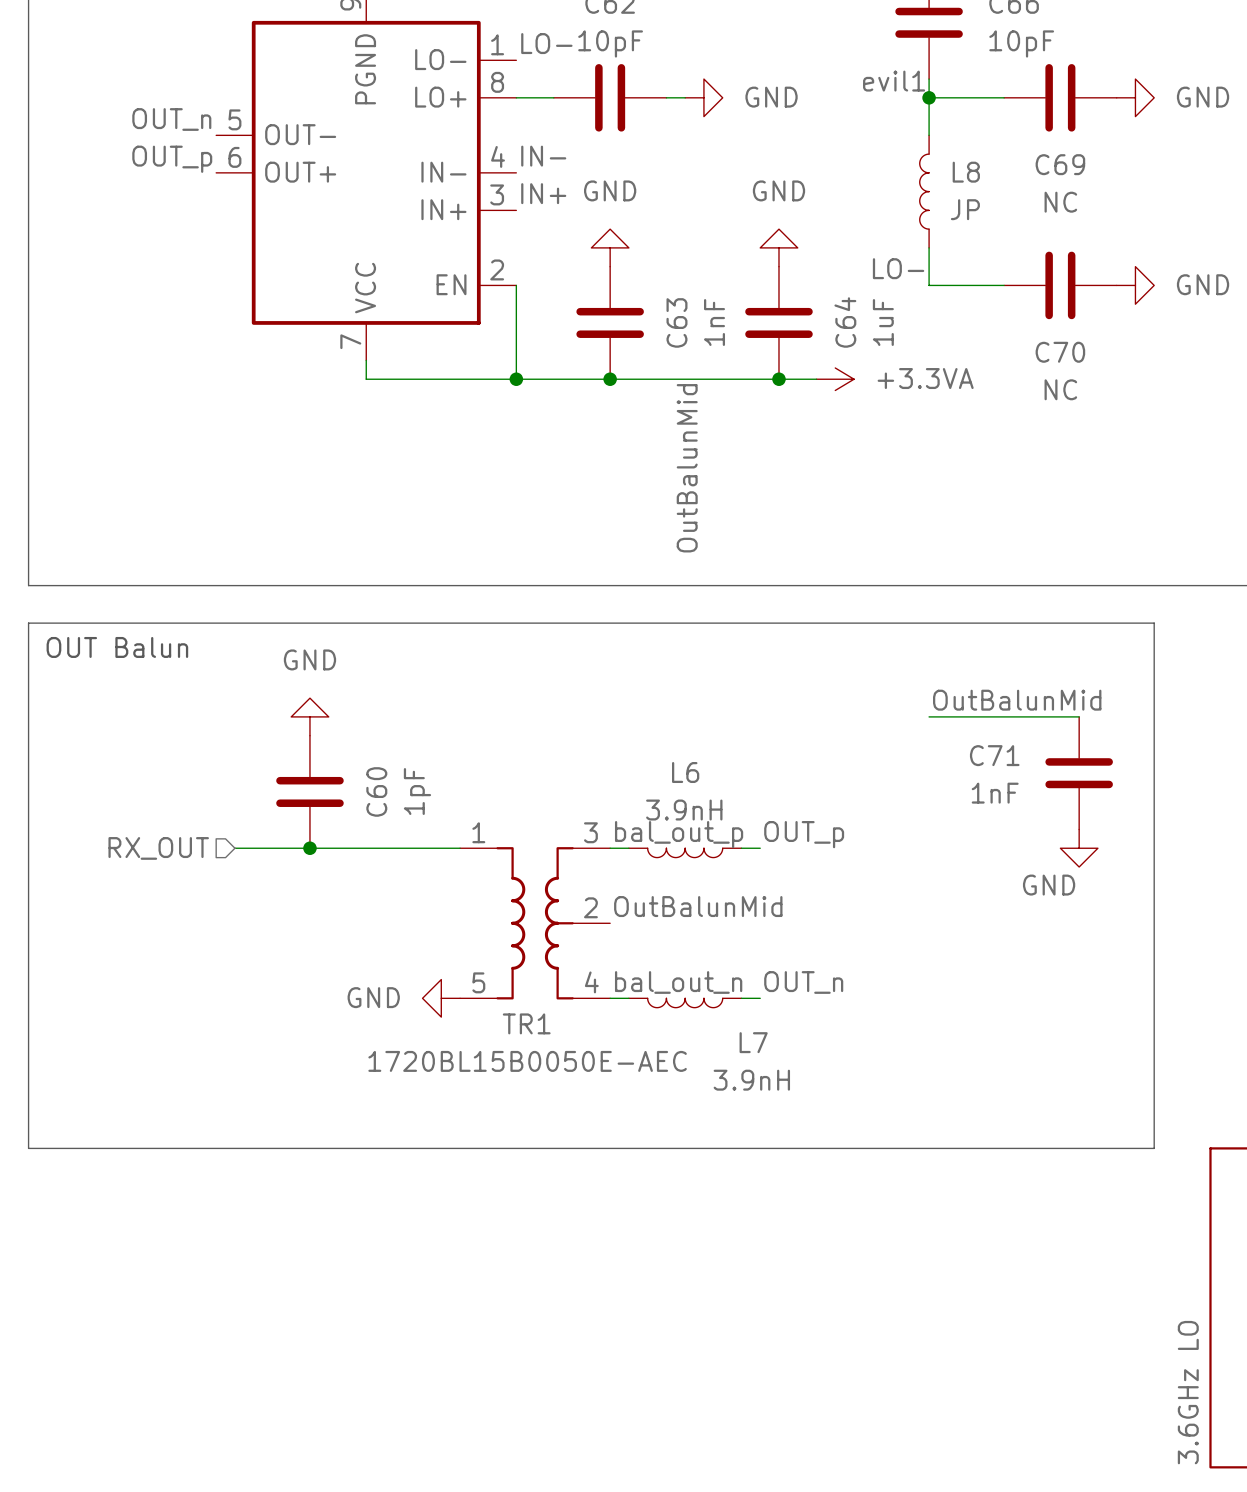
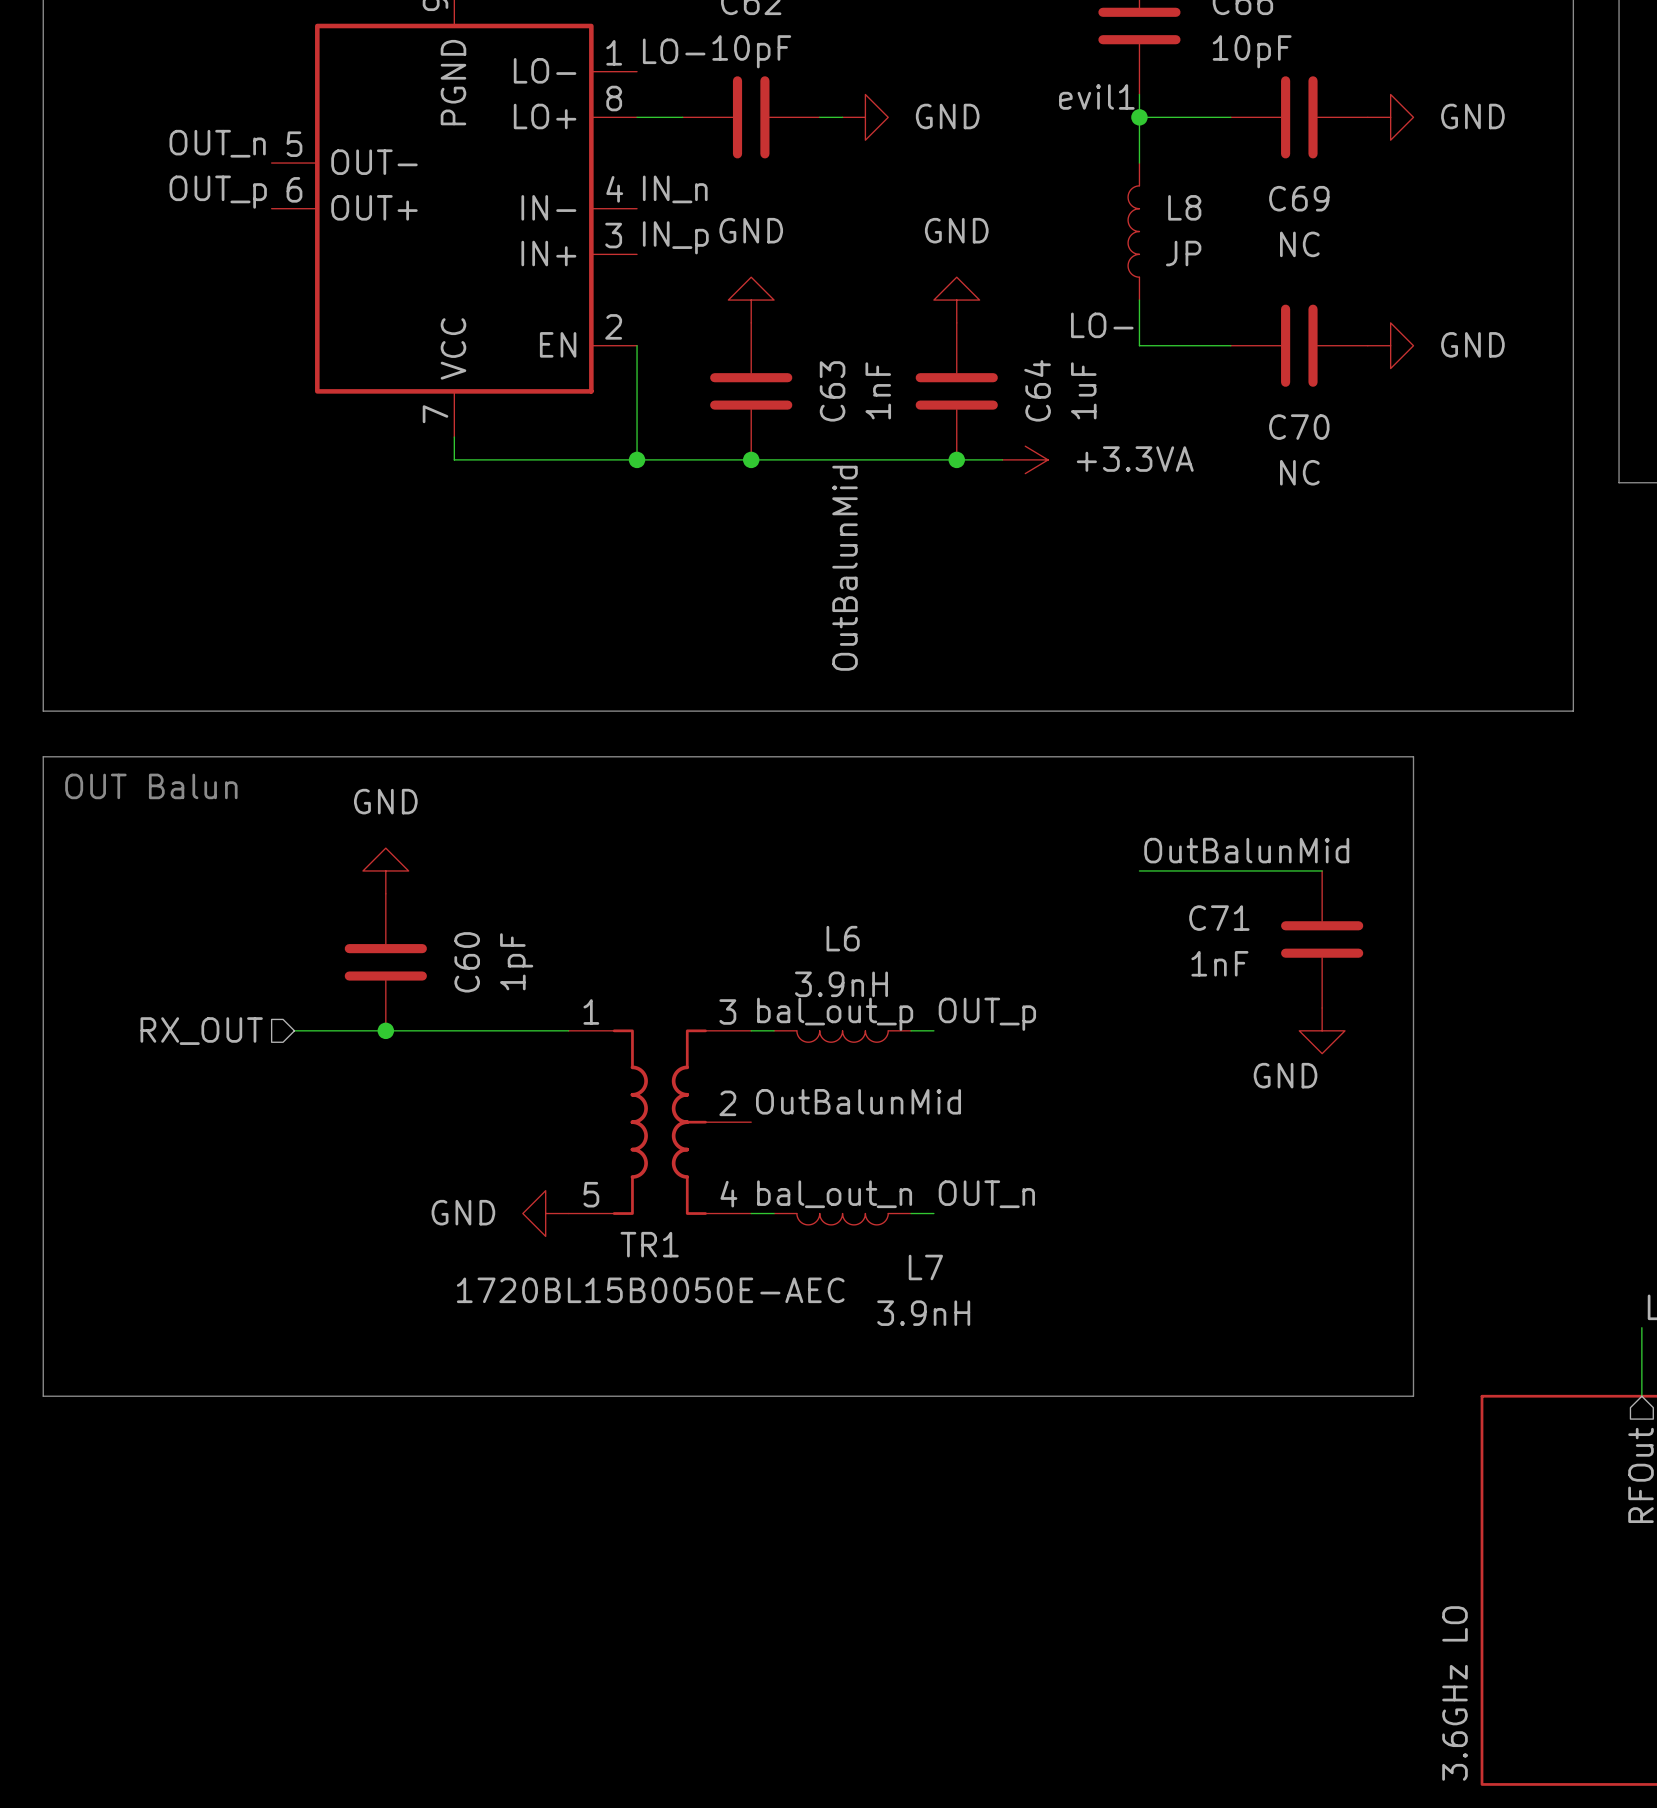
label: IN- (543, 156) -> IN_n (675, 189)
label: IN+ (543, 193) -> IN_p (675, 237)

